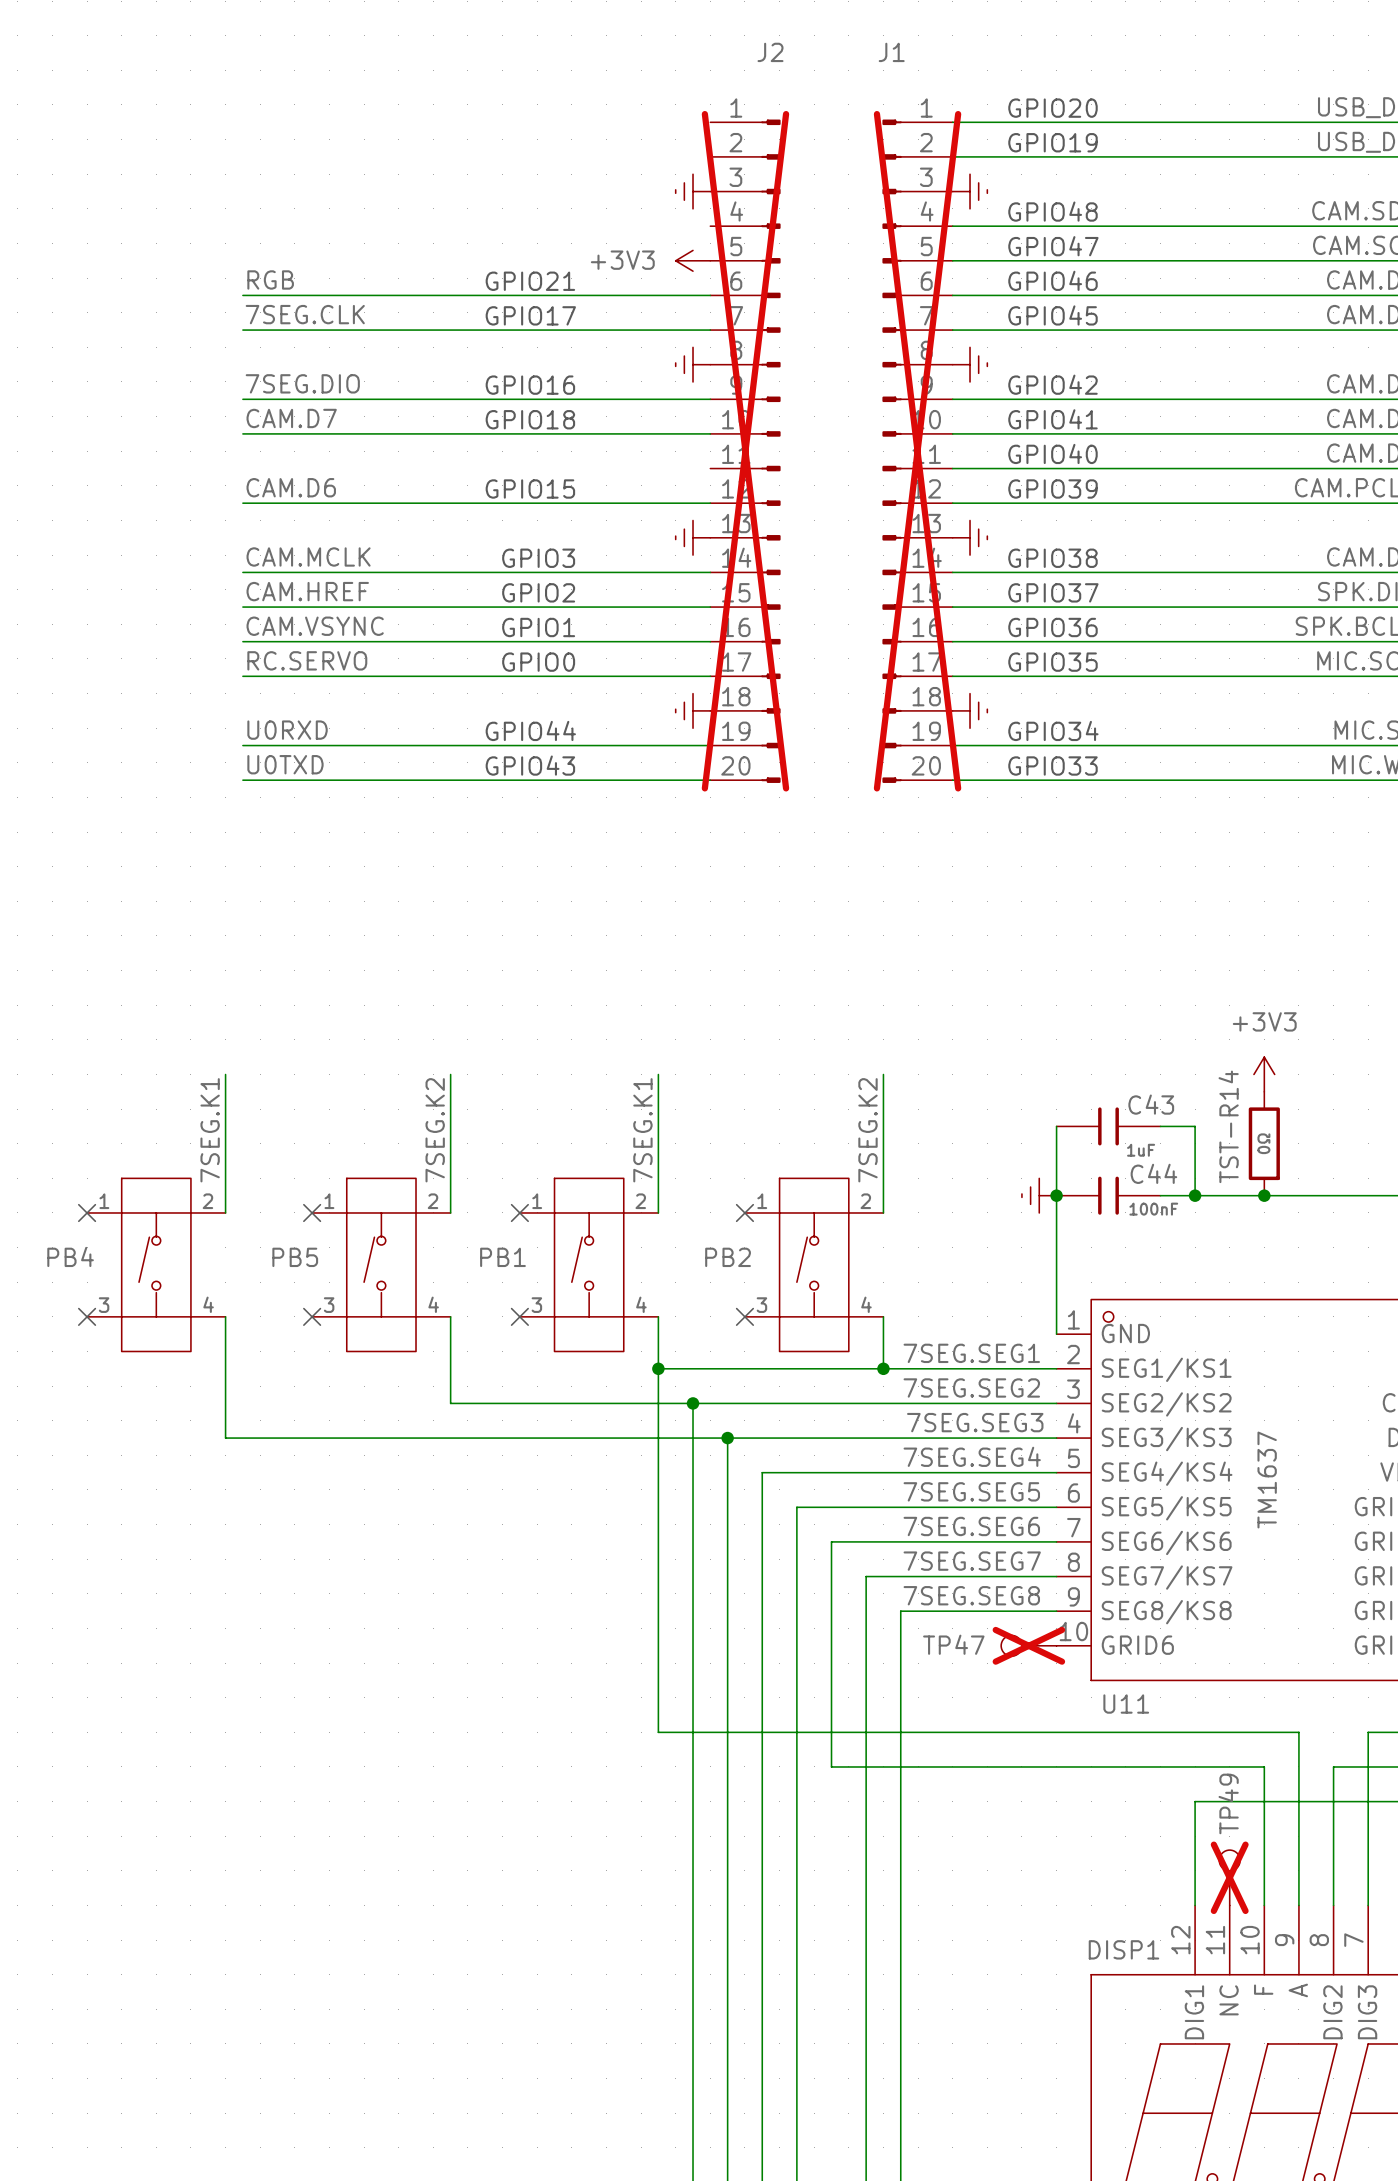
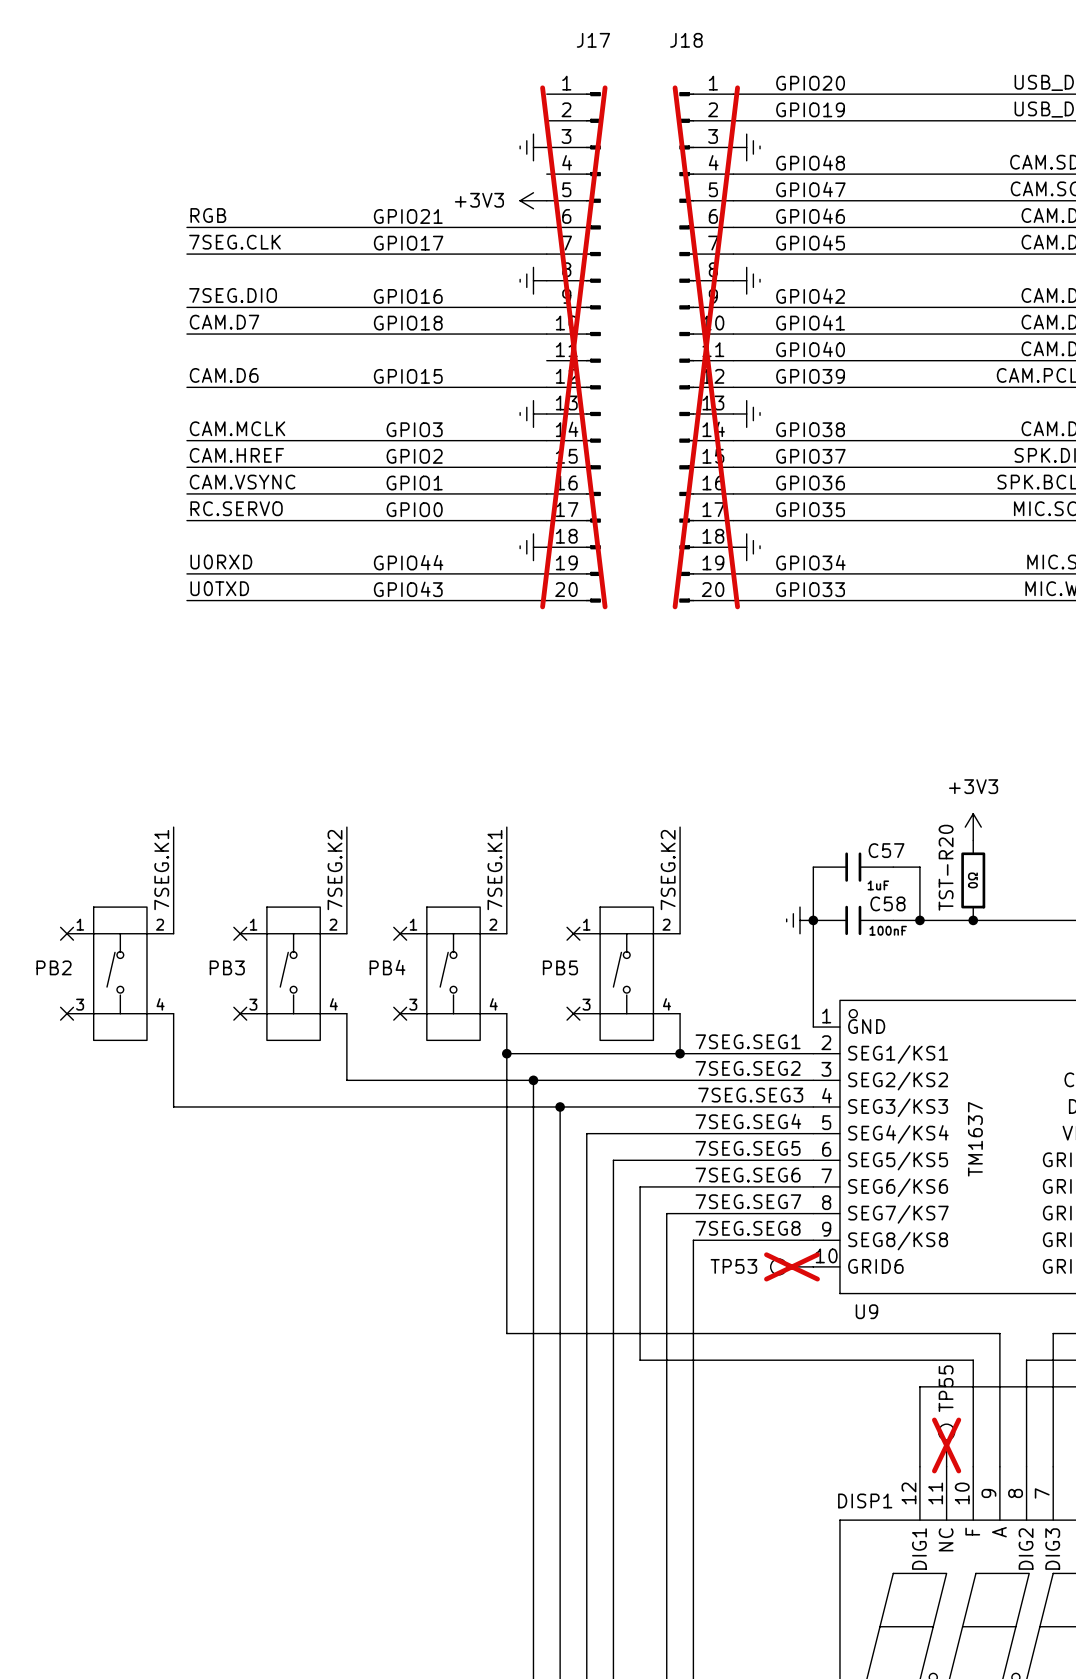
J2 name: J2 (770, 52) -> J17 (593, 40)
J1 name: J1 (891, 52) -> J18 (686, 40)
C43 name: C43 (1151, 1104) -> C57 (886, 850)
TST-R14 name: TST-R14 (1228, 1126) -> TST-R20 (946, 867)
C44 name: C44 (1153, 1173) -> C58 (887, 903)
PB4 name: PB4 (70, 1256) -> PB2 (54, 967)
PB5 name: PB5 (295, 1257) -> PB3 (227, 967)
PB1 name: PB1 (502, 1257) -> PB4 (387, 967)
PB2 name: PB2 (728, 1257) -> PB5 (560, 967)
TP47 name: TP47 (953, 1644) -> TP53 (733, 1266)
U11 name: U11 (1126, 1704) -> U9 (866, 1311)
TP49 name: TP49 (1228, 1803) -> TP55 (946, 1388)

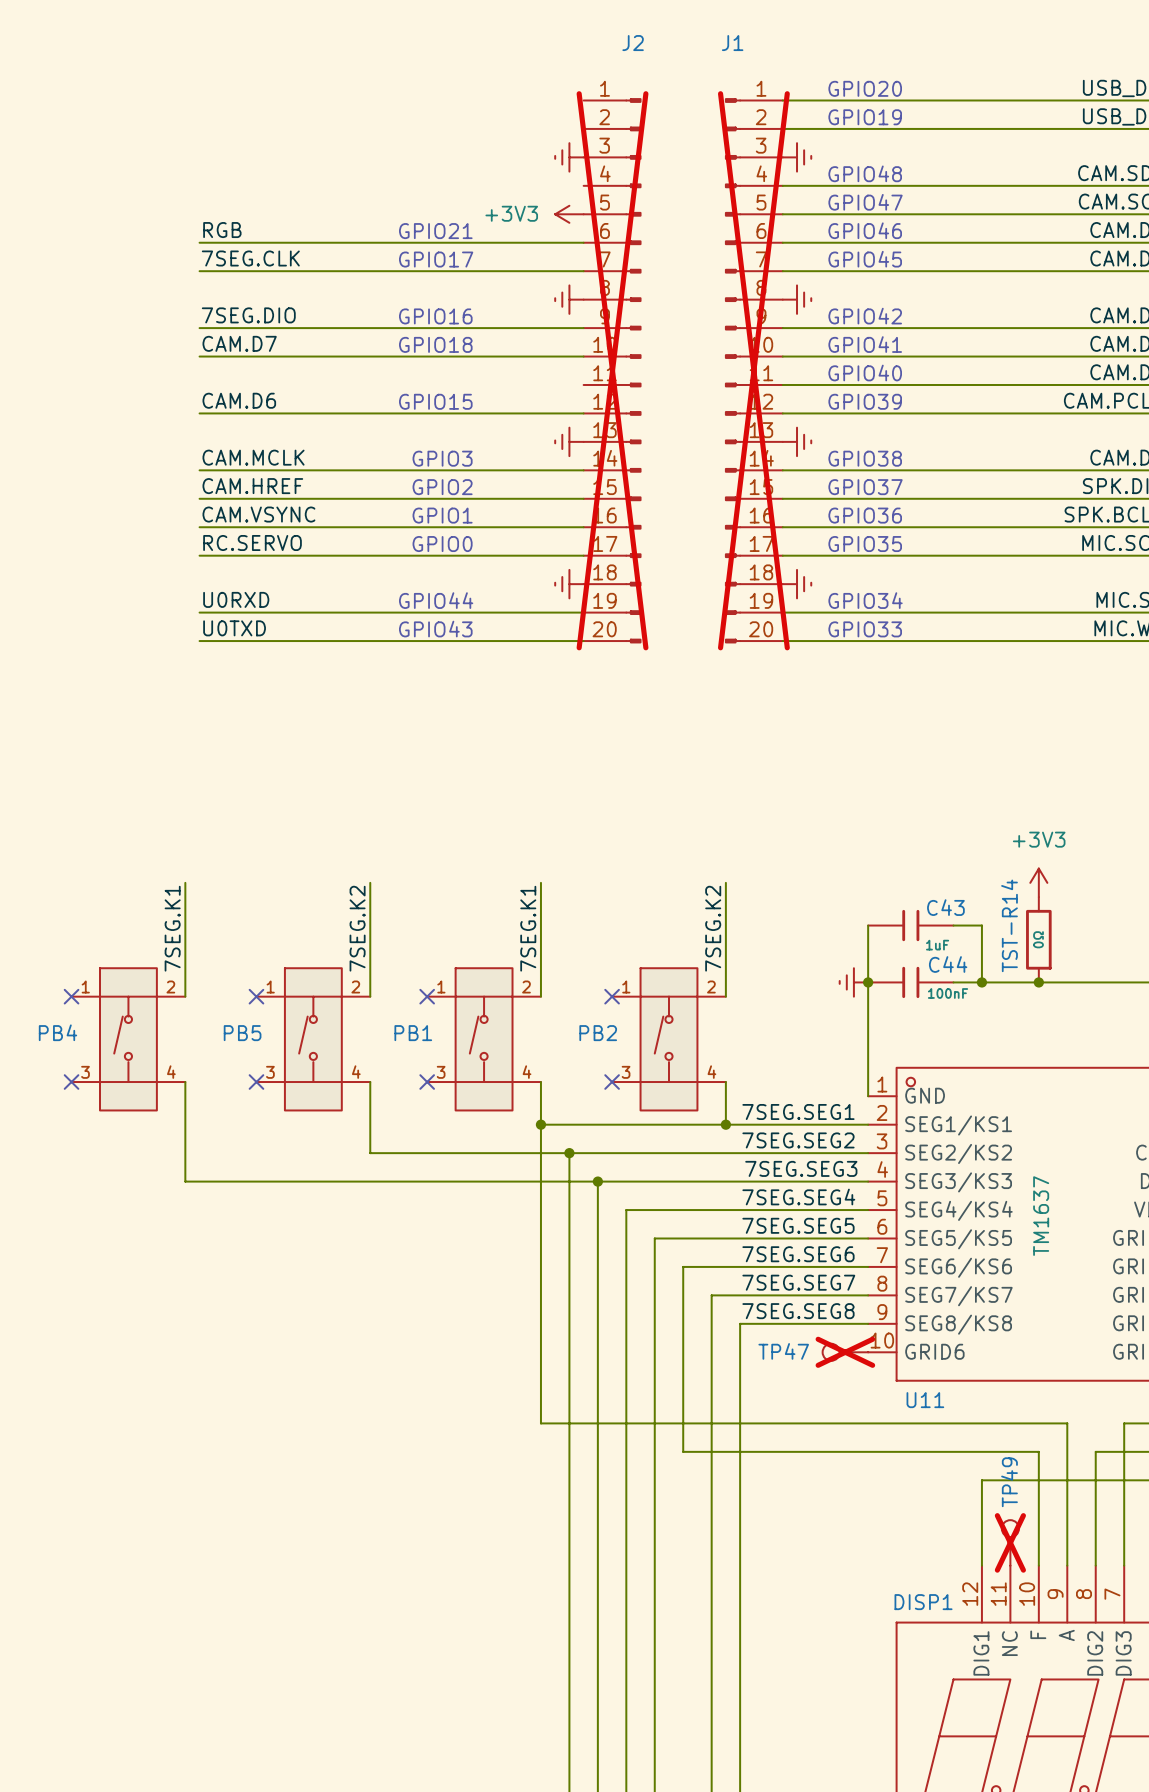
J17 name: J17 (593, 40) -> J2 (633, 43)
J18 name: J18 (686, 40) -> J1 (732, 43)
C57 name: C57 (886, 850) -> C43 (945, 907)
TST-R20 name: TST-R20 (946, 867) -> TST-R14 (1009, 925)
C58 name: C58 (887, 903) -> C44 (948, 964)
PB2 name: PB2 (54, 967) -> PB4 (57, 1032)
PB3 name: PB3 (227, 967) -> PB5 (242, 1033)
PB4 name: PB4 (387, 967) -> PB1 (413, 1033)
PB5 name: PB5 (560, 967) -> PB2 (598, 1033)
TP53 name: TP53 (733, 1266) -> TP47 (783, 1351)
U9 name: U9 (866, 1311) -> U11 (925, 1400)
TP55 name: TP55 (946, 1388) -> TP49 (1009, 1482)

